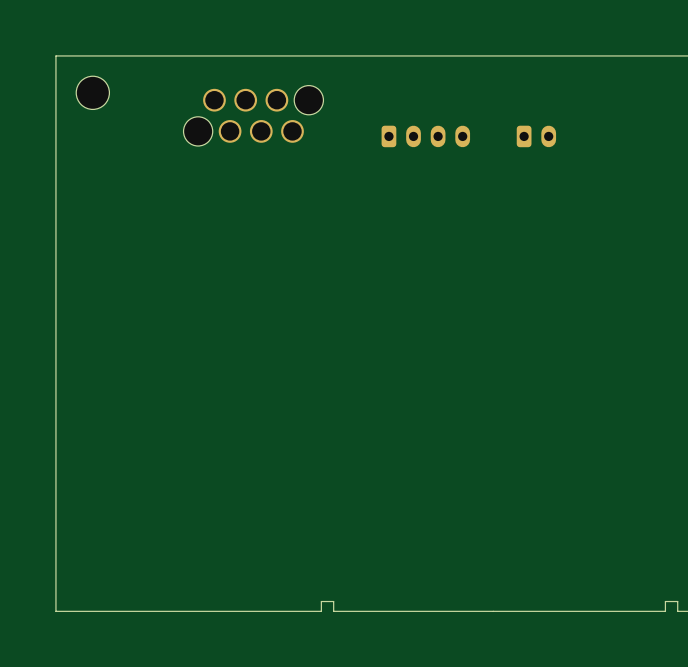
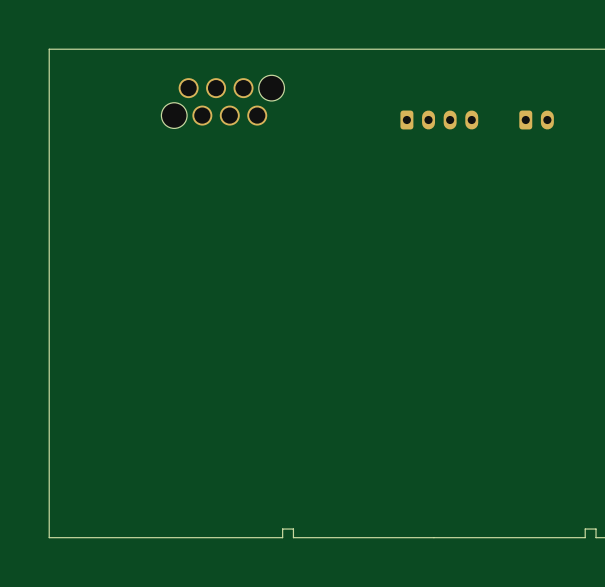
part: (92, 92) -> none
part position: (425, 136) -> (439, 120)
part position: (536, 136) -> (536, 120)

